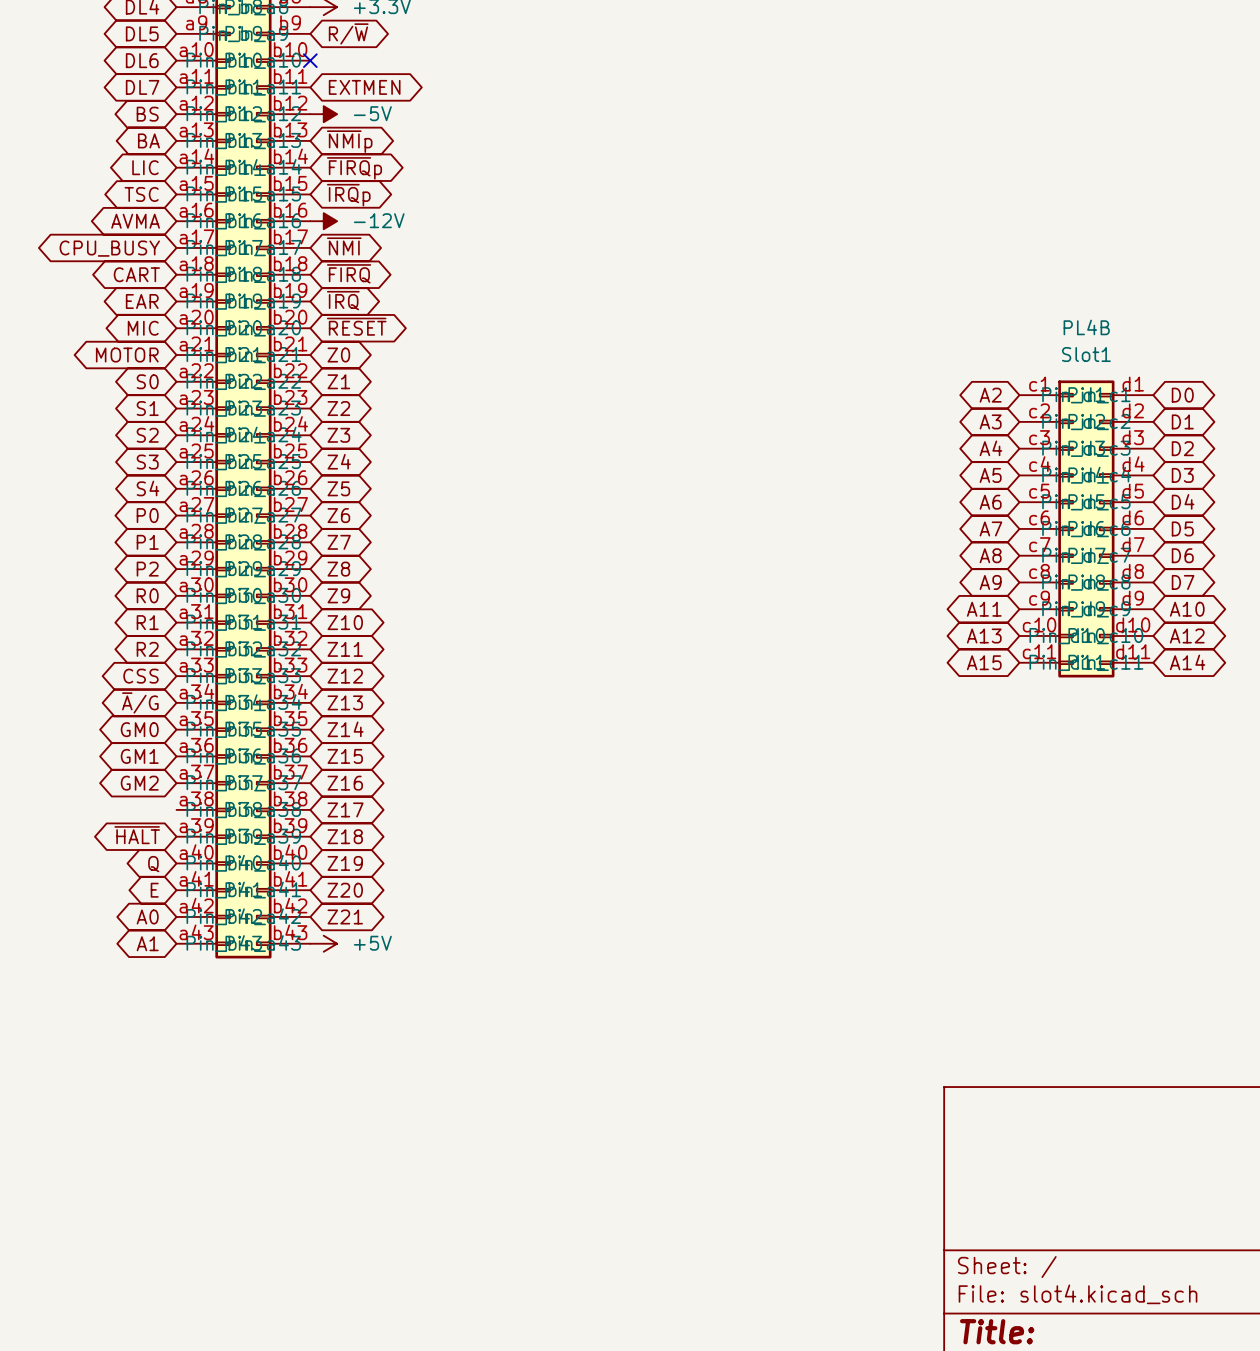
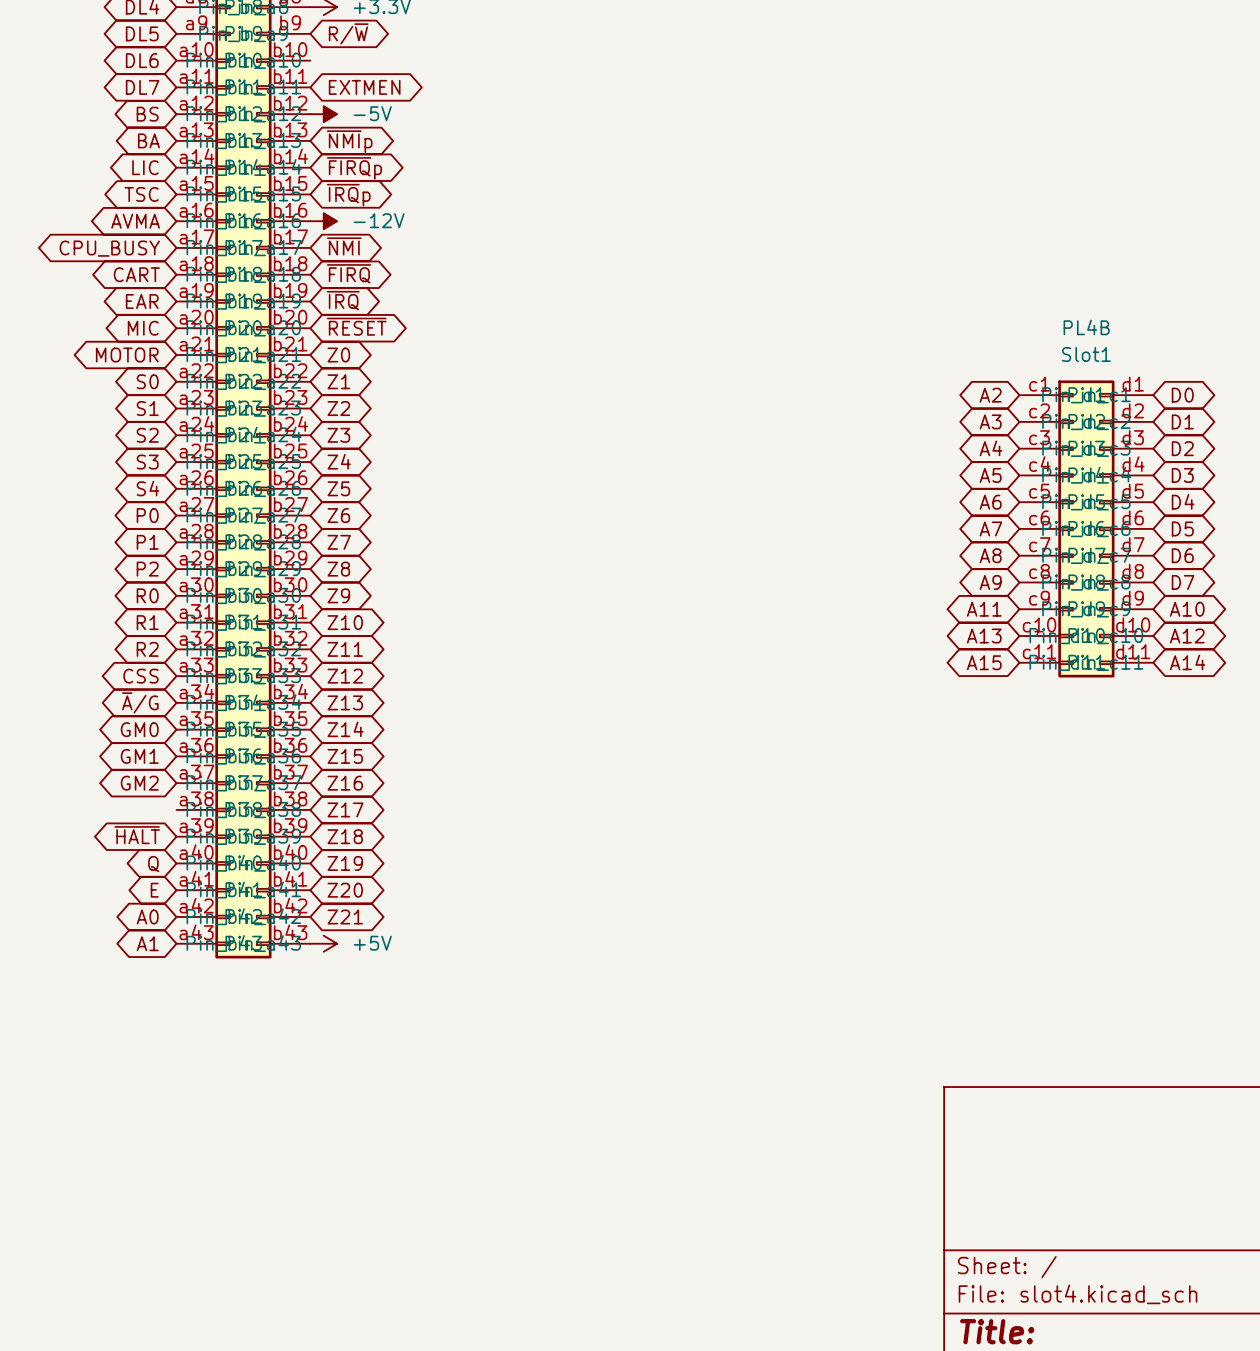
no-connect mark: (310, 60) -> none

